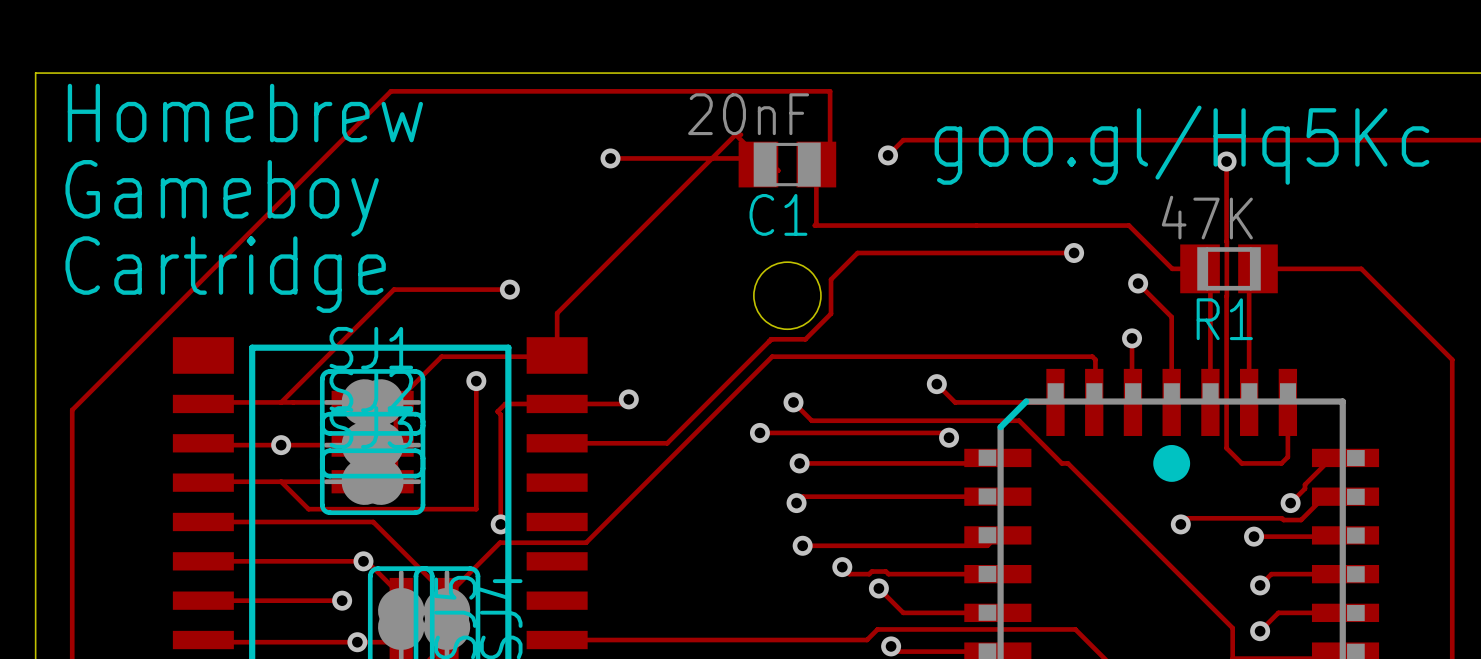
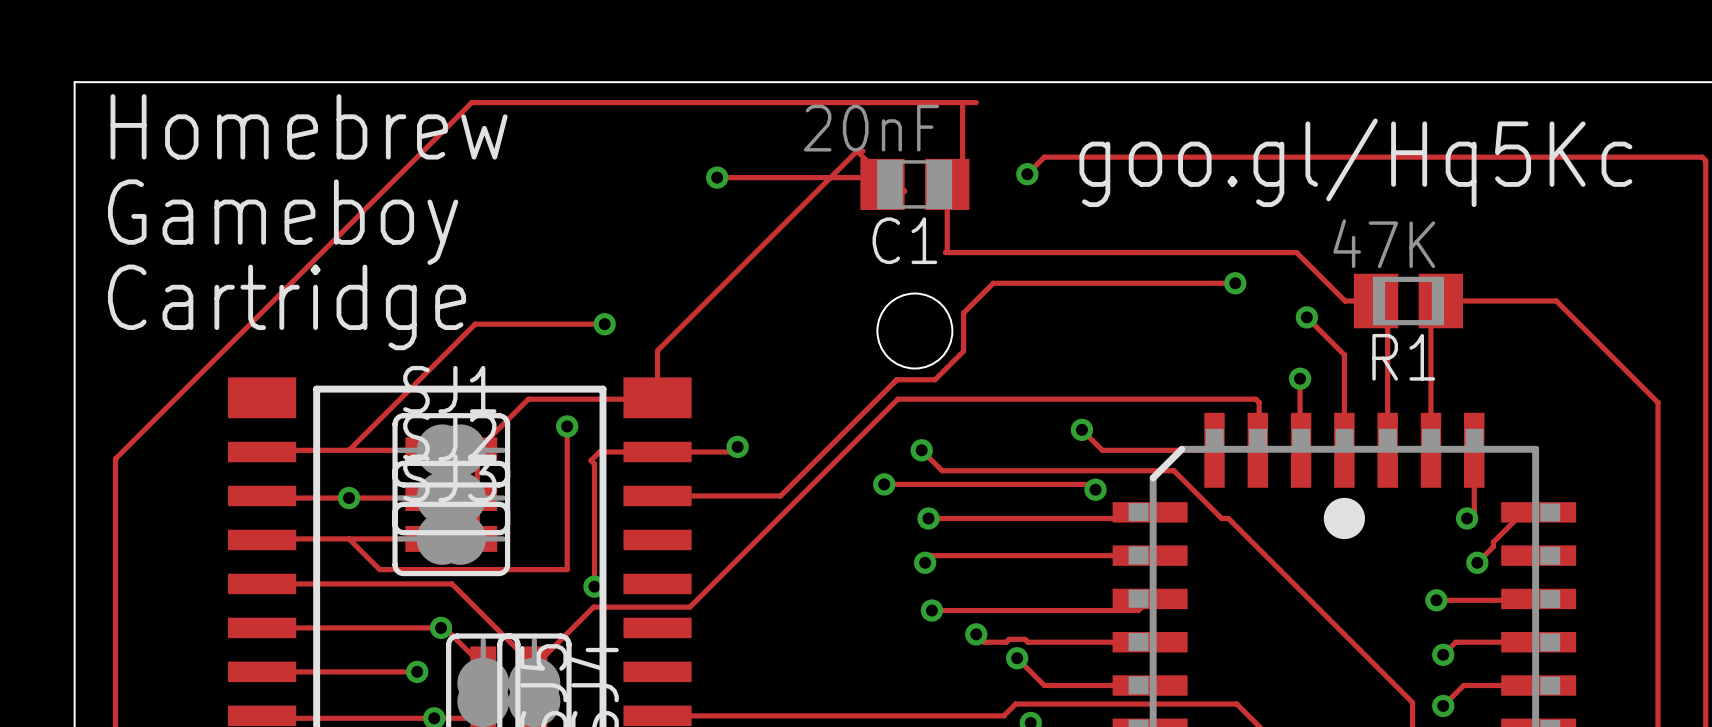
track: none -> (962, 102) (976, 102)
track: (1226, 161) (1226, 241) -> none
via: (1226, 161) -> none
track: (1226, 241) (1226, 296) -> none
track: (1226, 296) (1226, 448) (1241, 463) (1281, 463) -> none
track: (1345, 496) (1324, 496) (1301, 520) (1186, 518) (1180, 524) -> none
via position: (1180, 524) -> (1467, 518)

